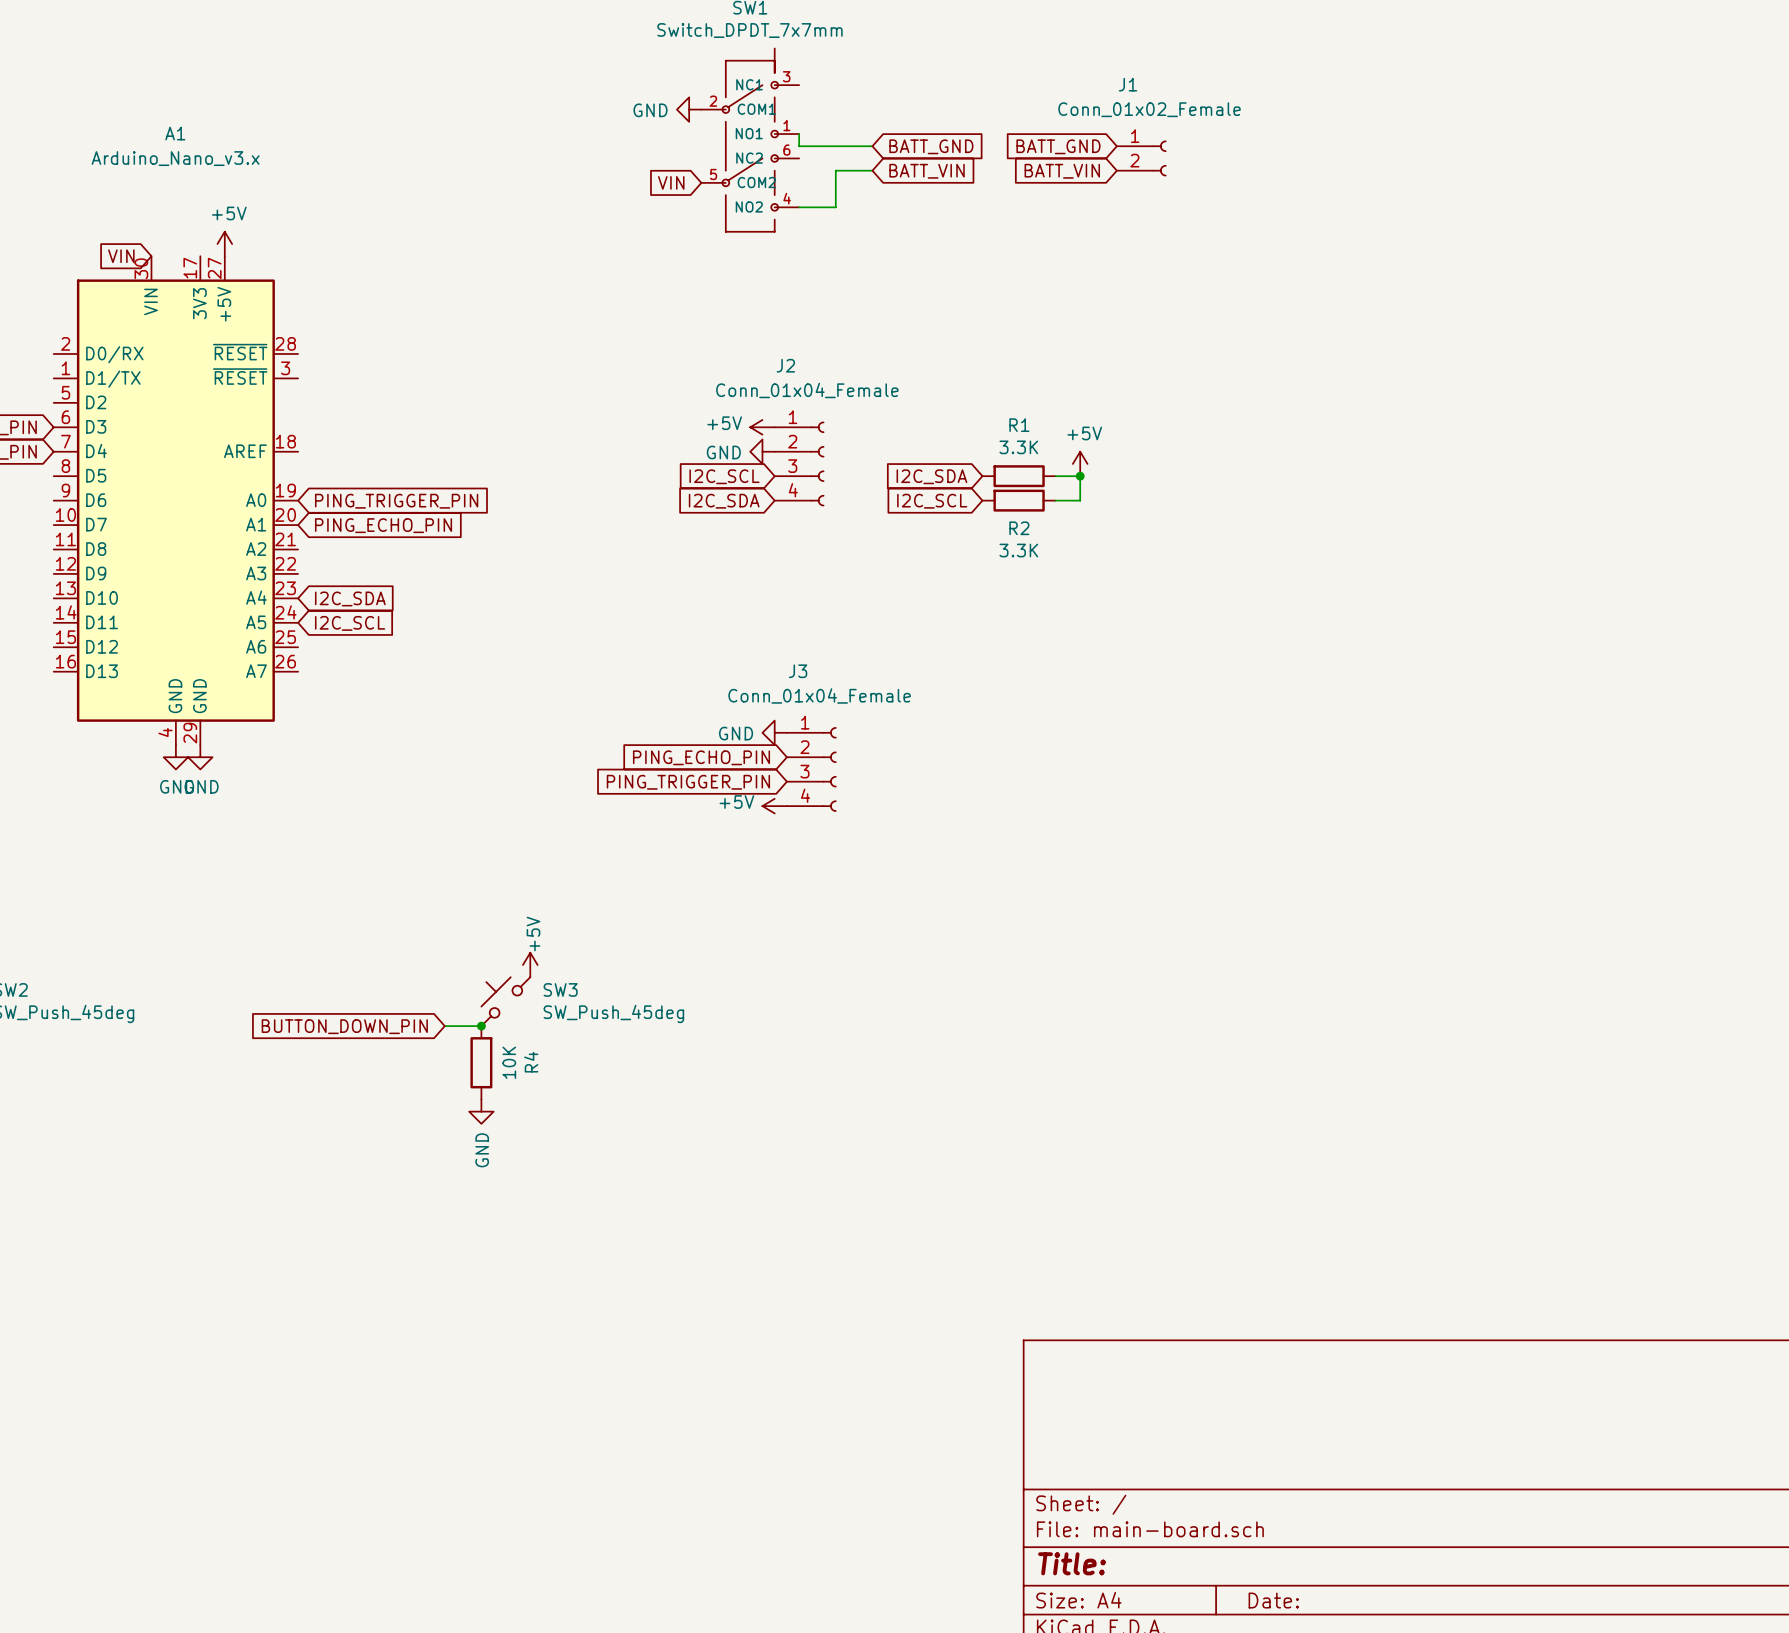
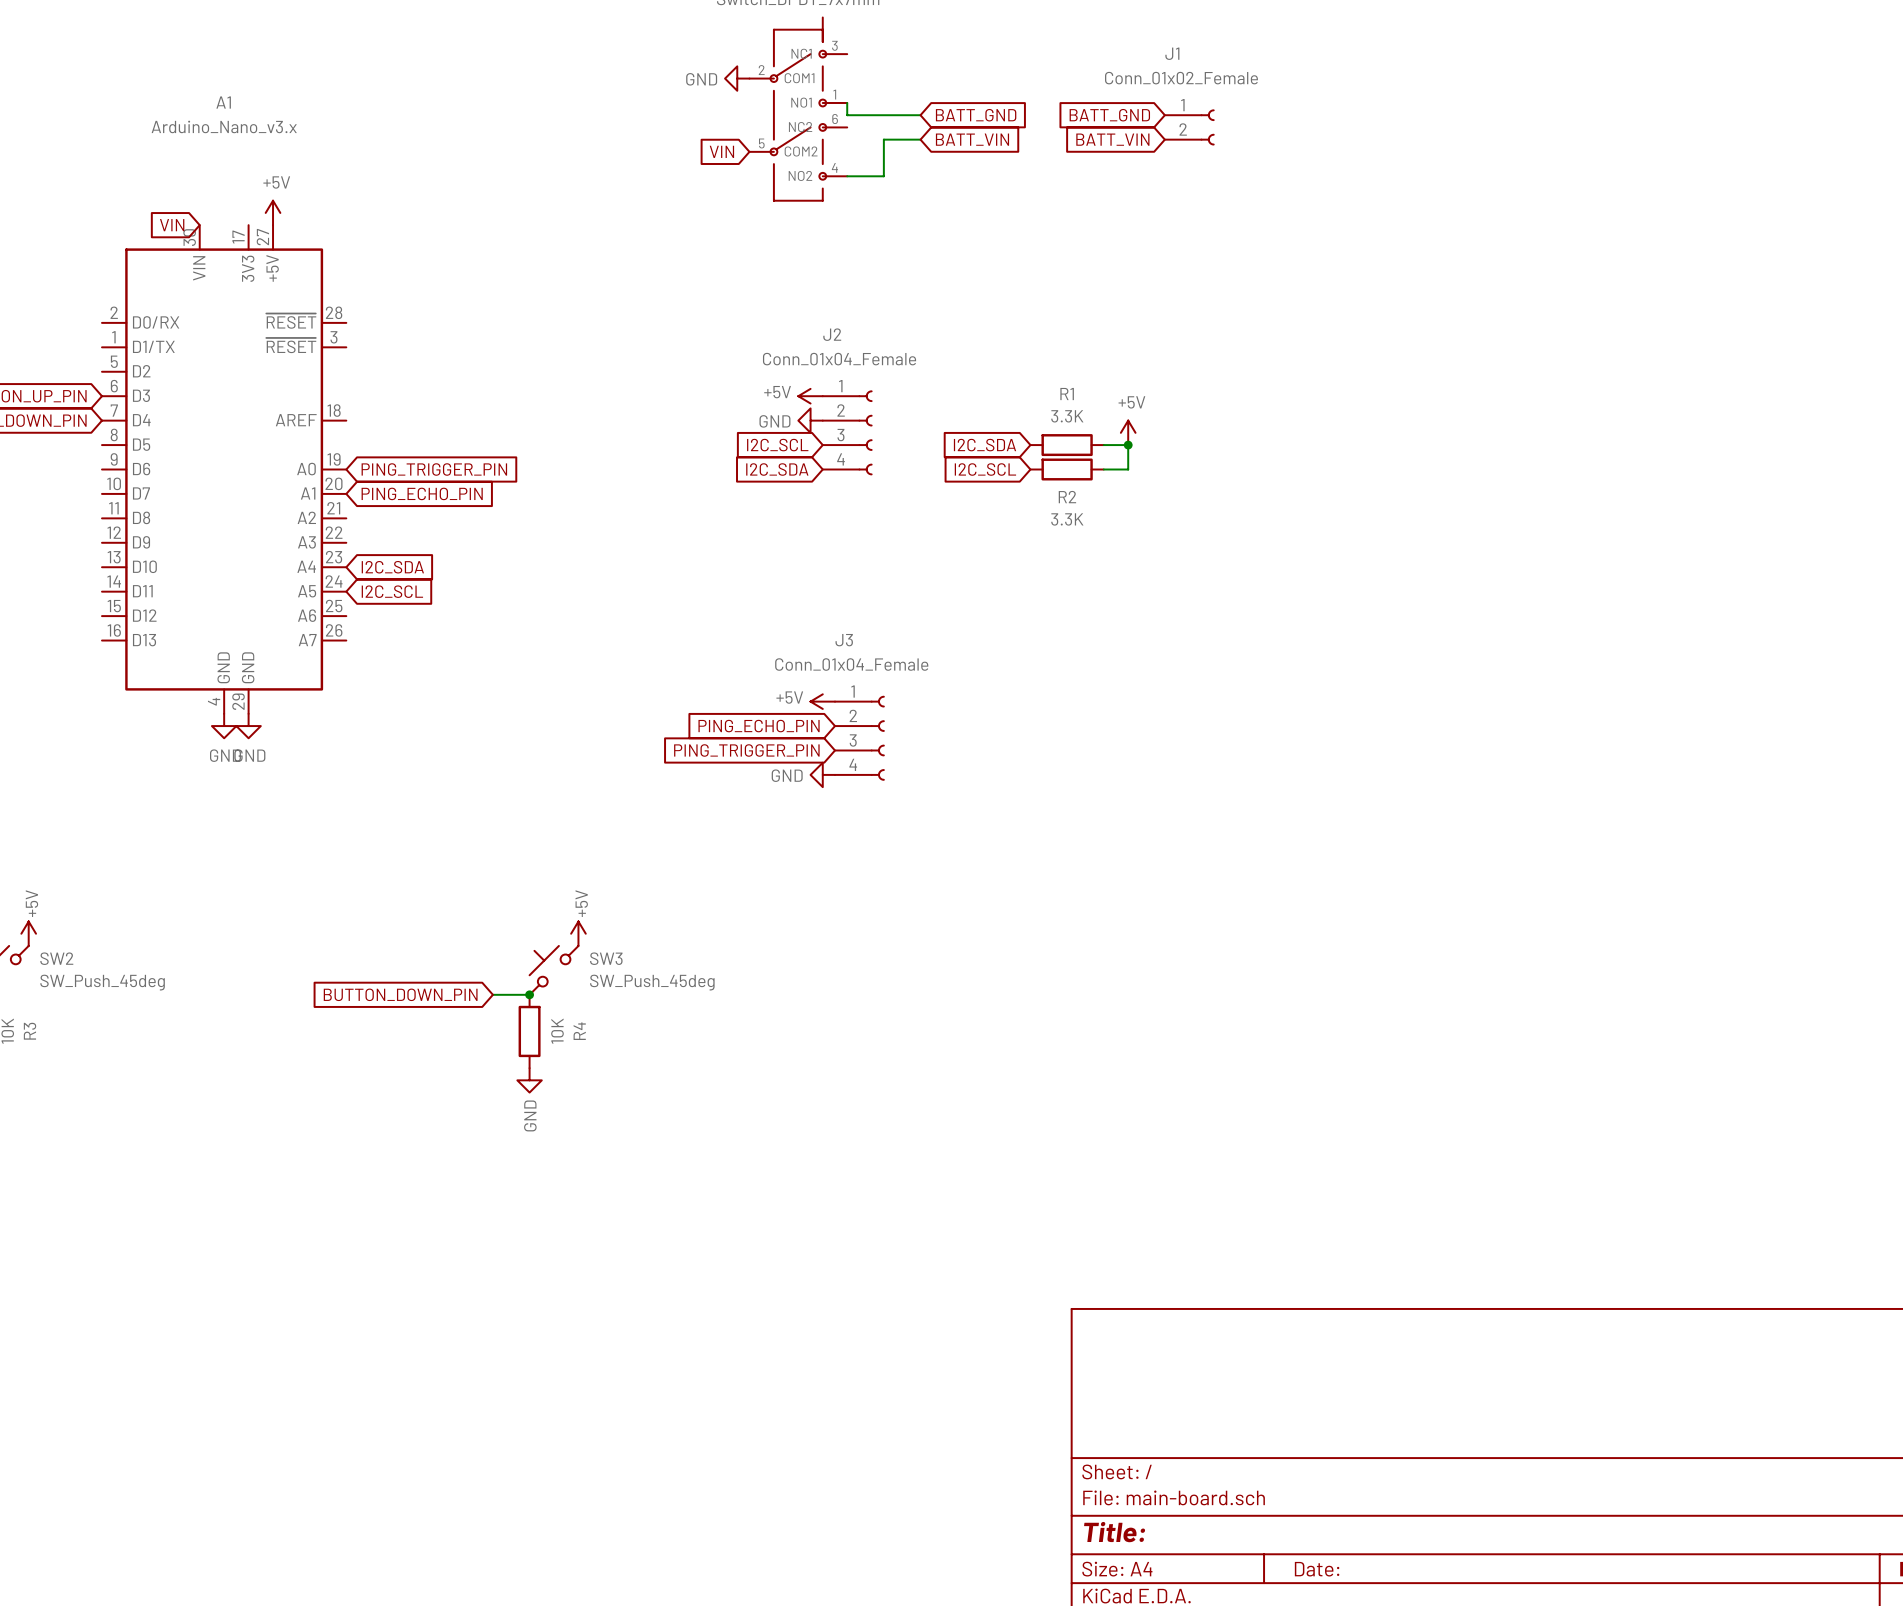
power symbol: GND (774, 732) -> +5V (822, 701)
power symbol: +5V (774, 806) -> GND (822, 774)

